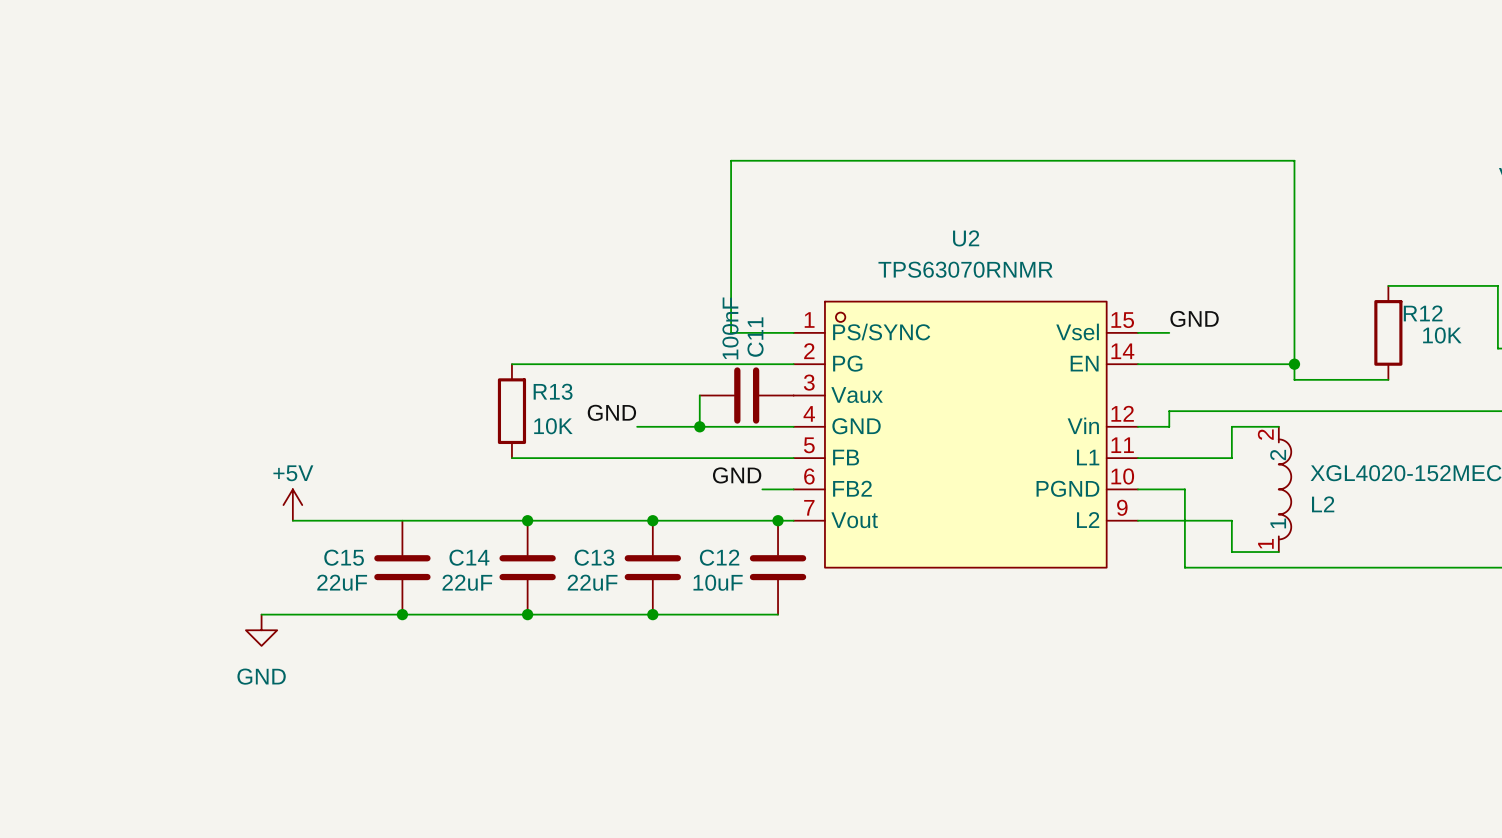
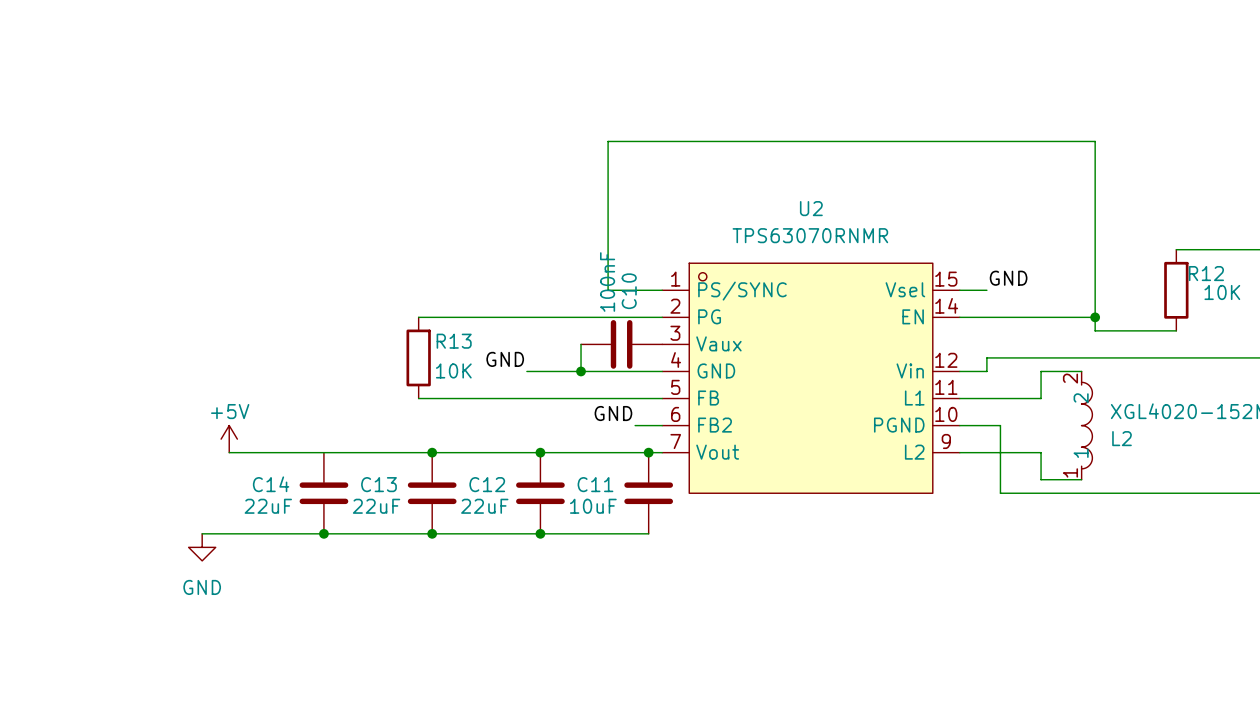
C11 name: C11 (755, 337) -> C10 (629, 291)
C15 name: C15 (344, 557) -> C14 (271, 484)
C14 name: C14 (469, 557) -> C13 (378, 484)
C13 name: C13 (594, 557) -> C12 (487, 484)
C12 name: C12 (719, 557) -> C11 (595, 484)

